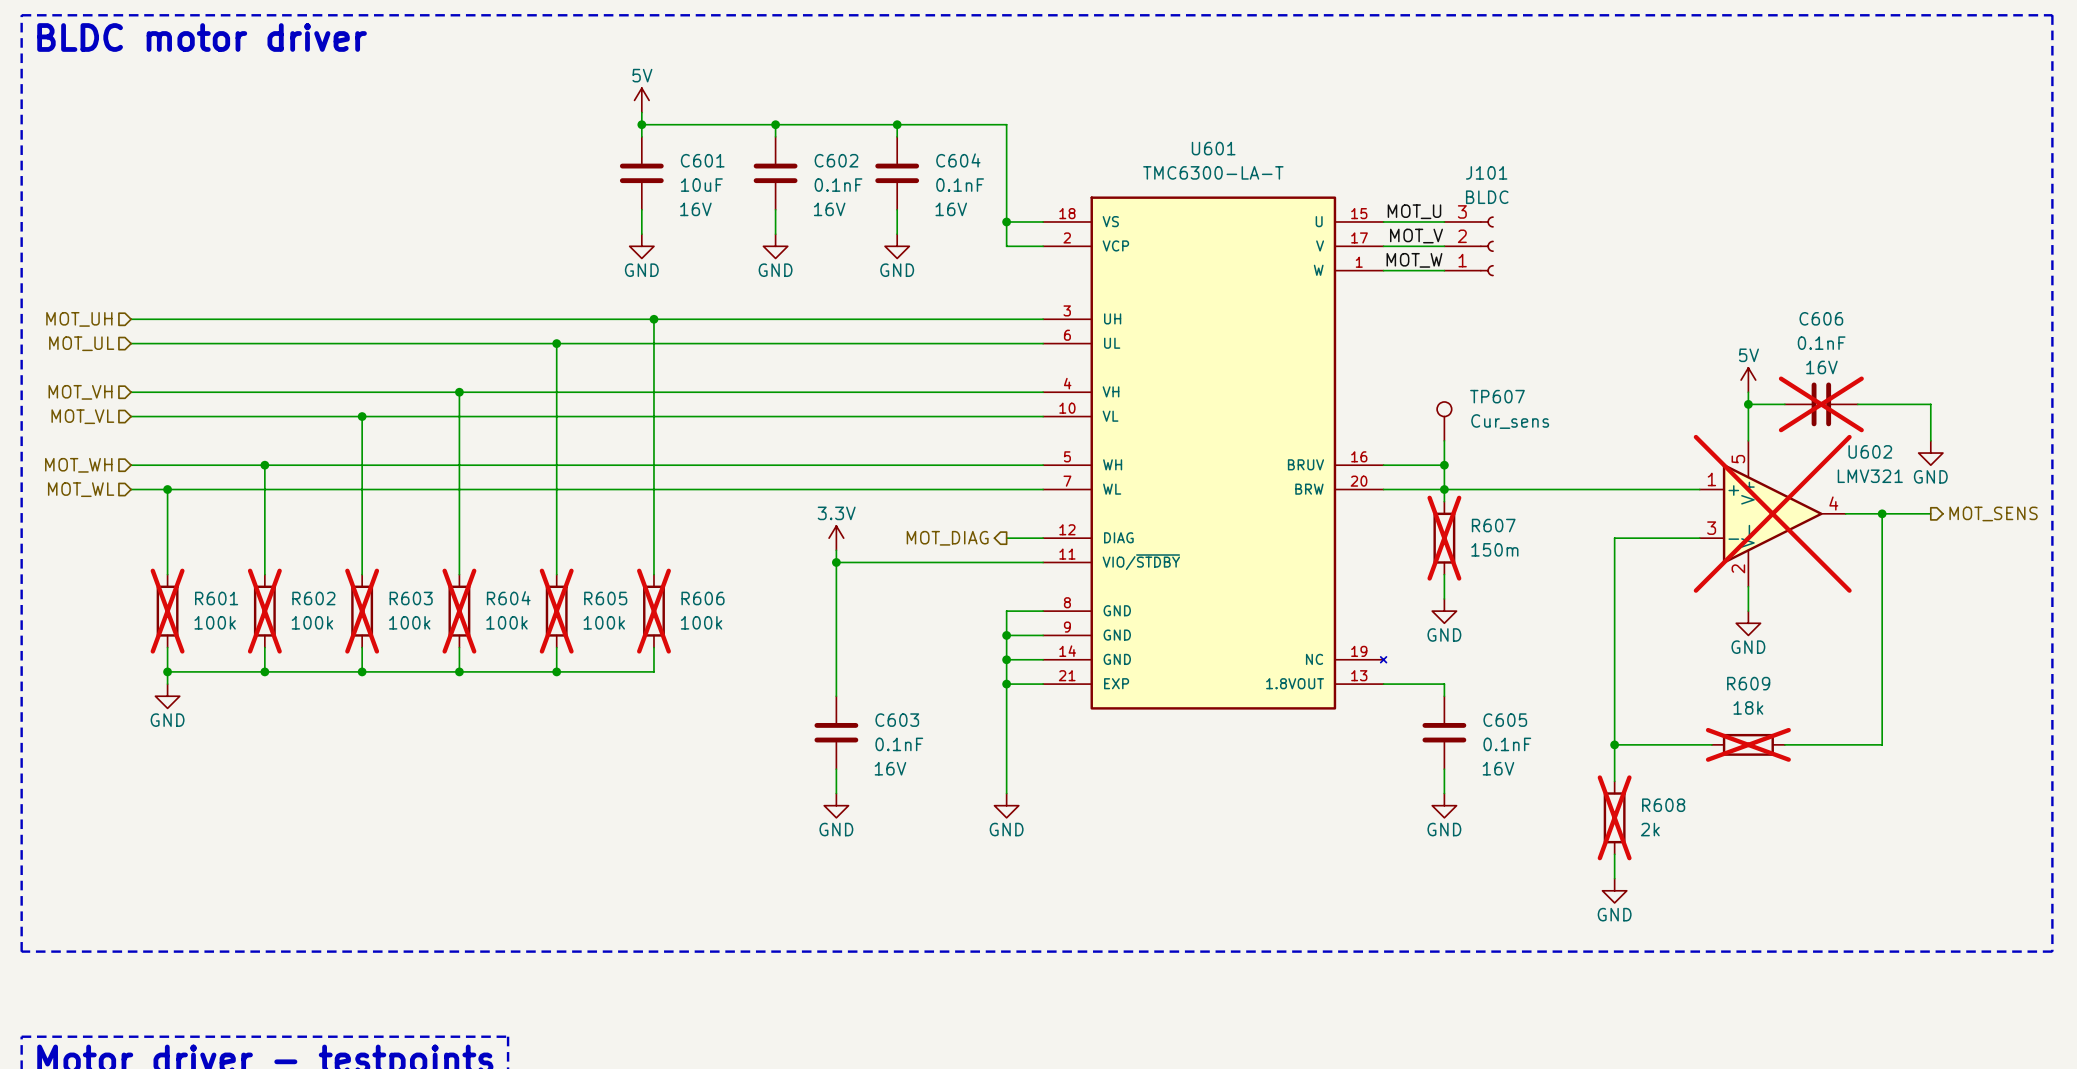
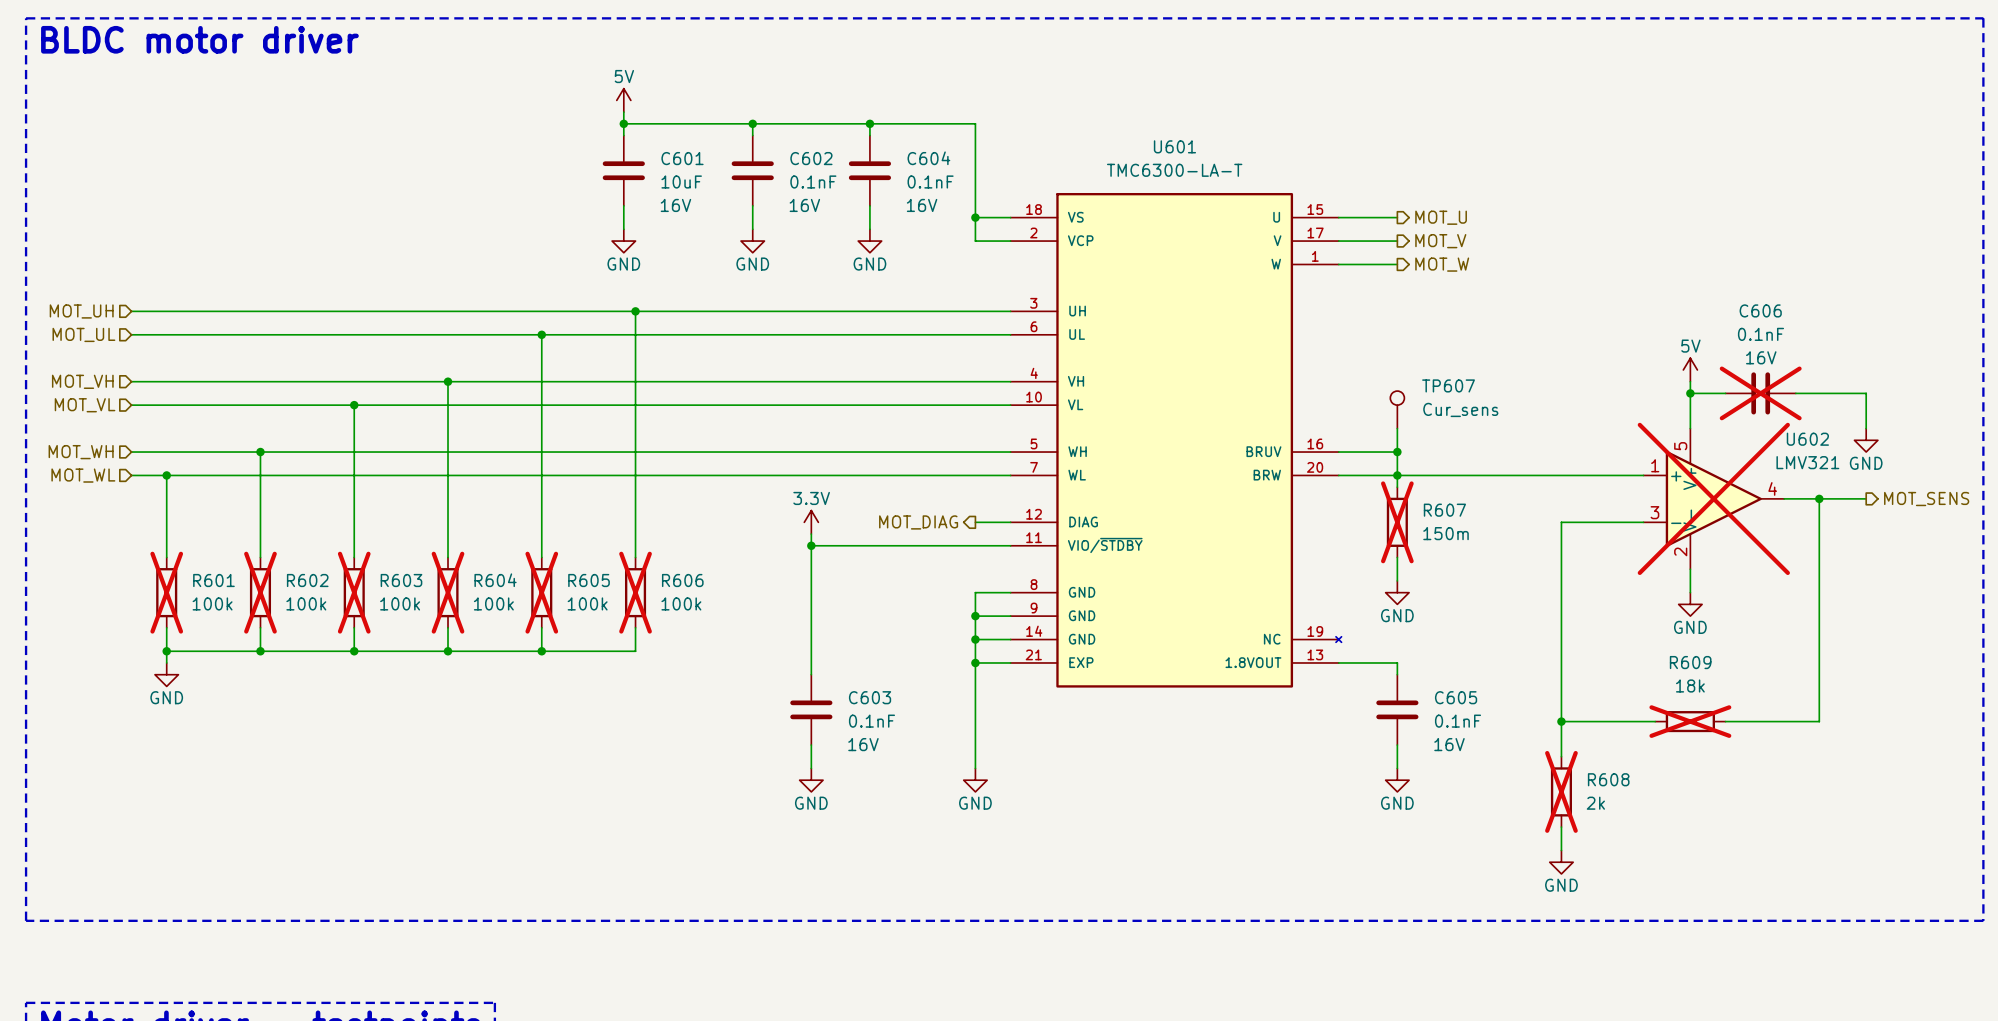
label: MOT_U (1414, 211) -> none
hierarchical label: none -> MOT_U (1441, 217)
label: MOT_V (1416, 236) -> none
J101: BLDC (1469, 246) -> none
hierarchical label: none -> MOT_V (1440, 241)
label: MOT_W (1414, 260) -> none
hierarchical label: none -> MOT_W (1442, 264)

